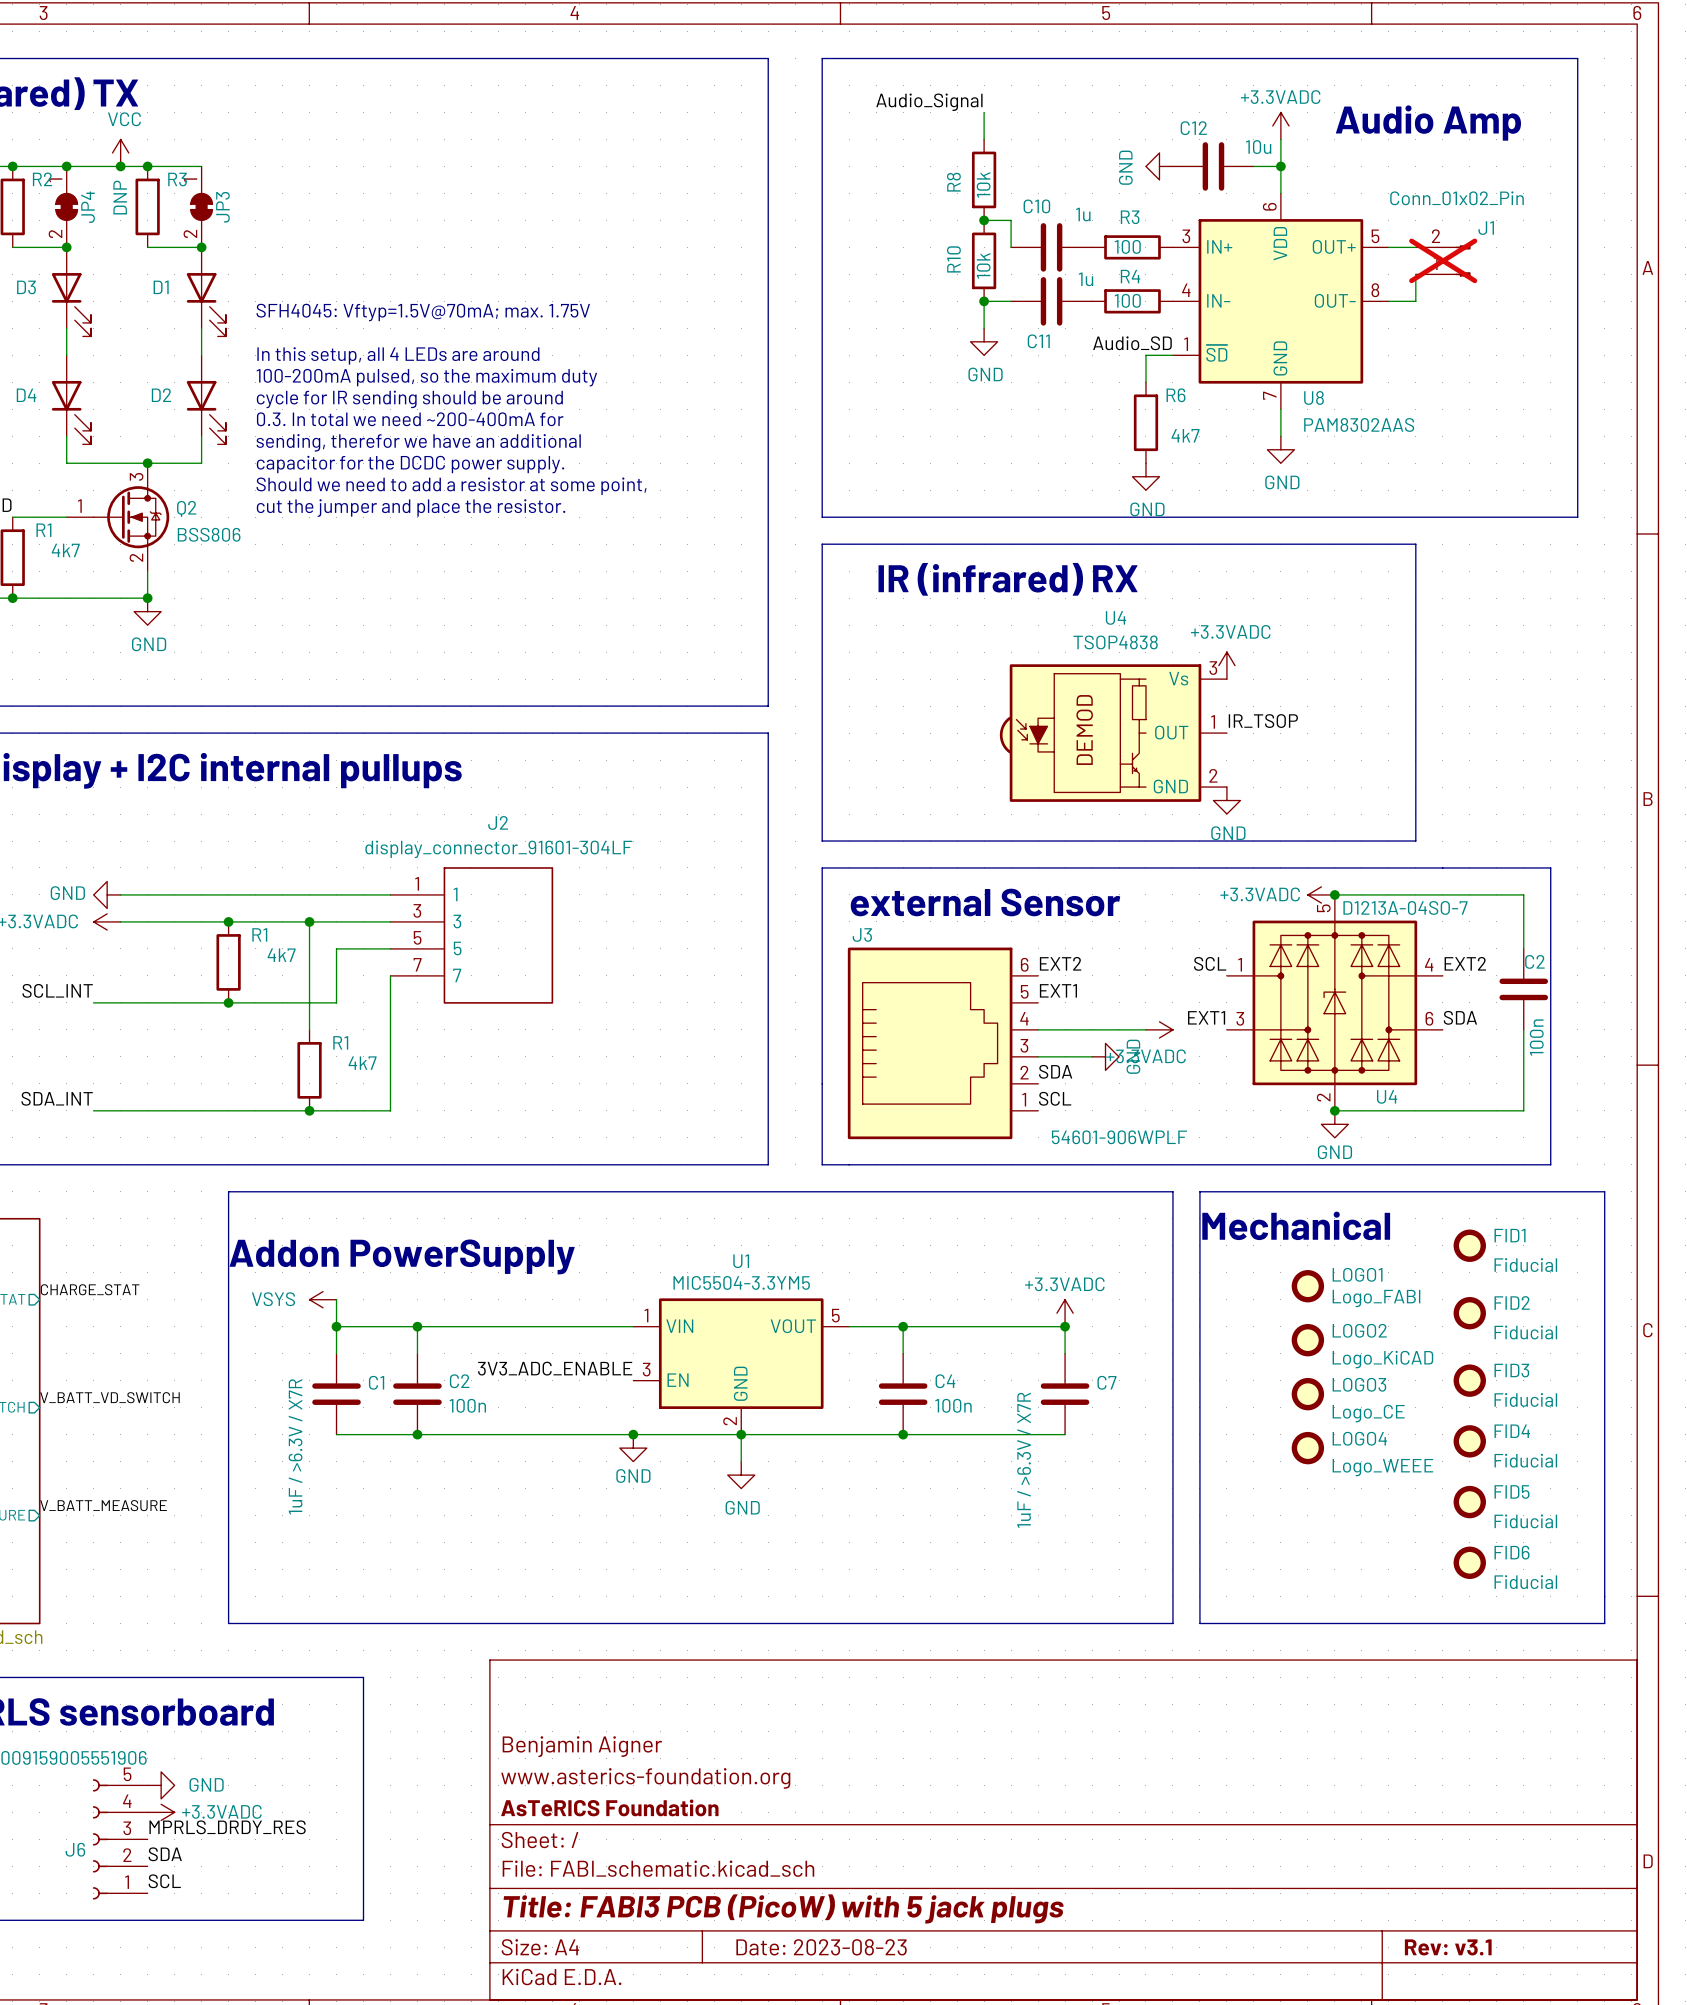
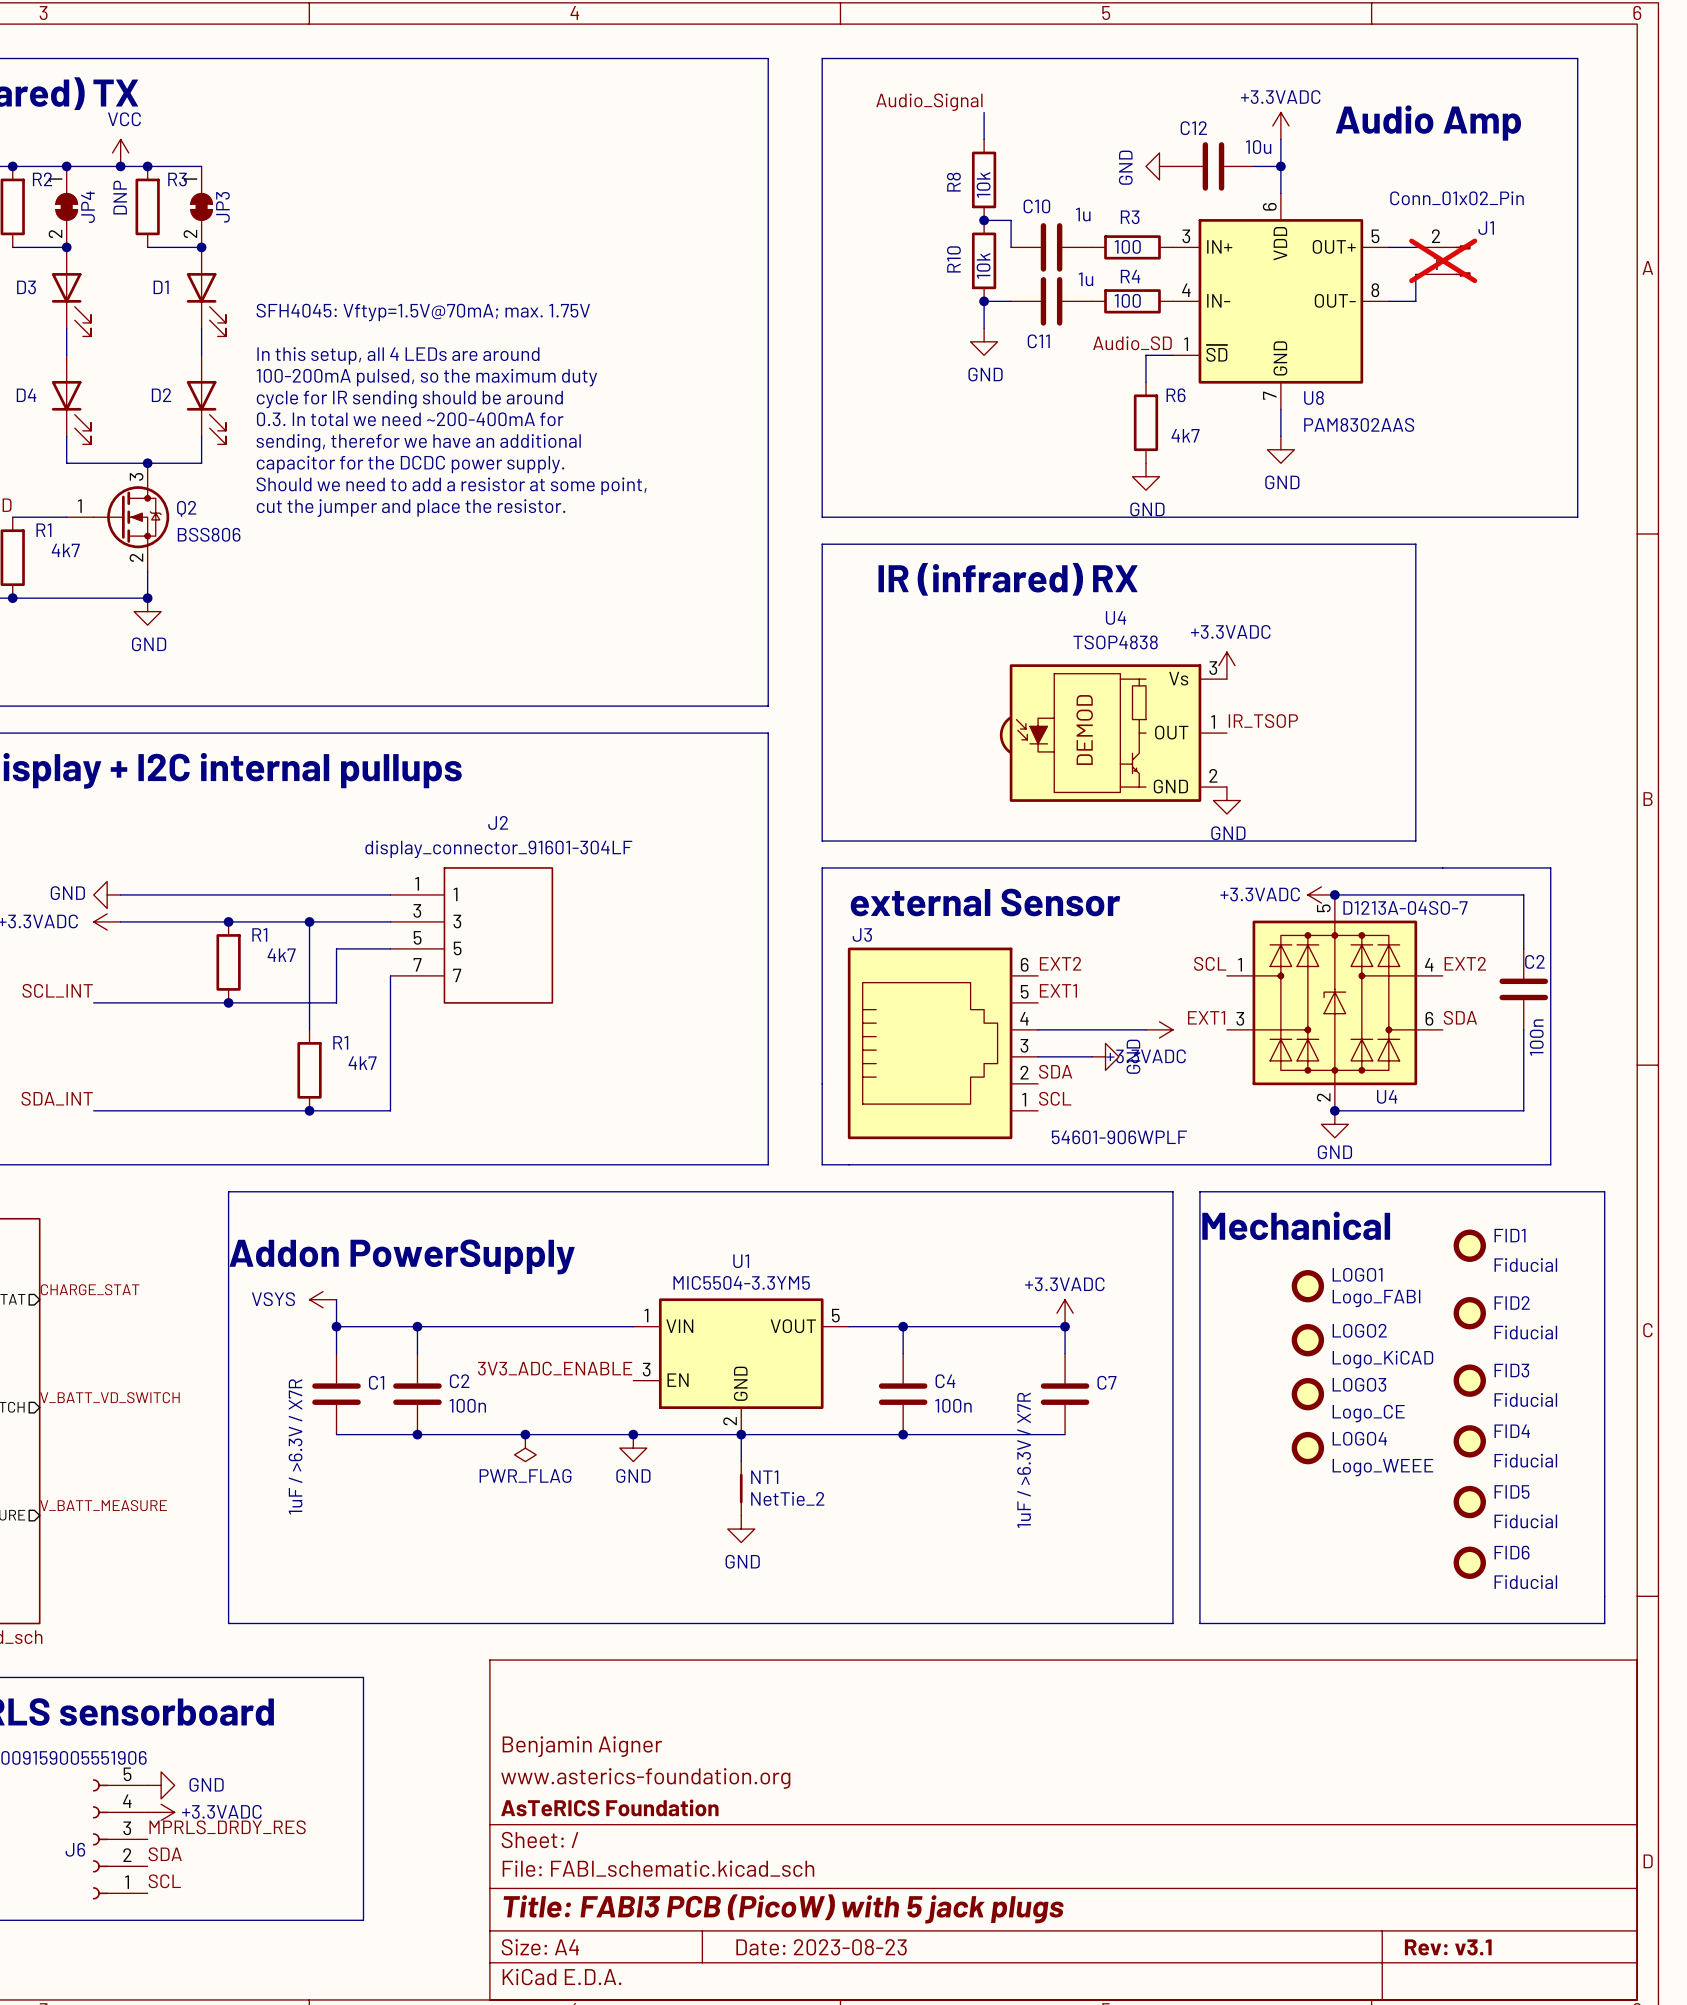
junction: none -> (525, 1434)
power symbol: none -> PWR_FLAG (525, 1448)
power symbol position: GND (741, 1475) -> GND (741, 1529)
NT1: none -> NetTie_2 (741, 1488)

